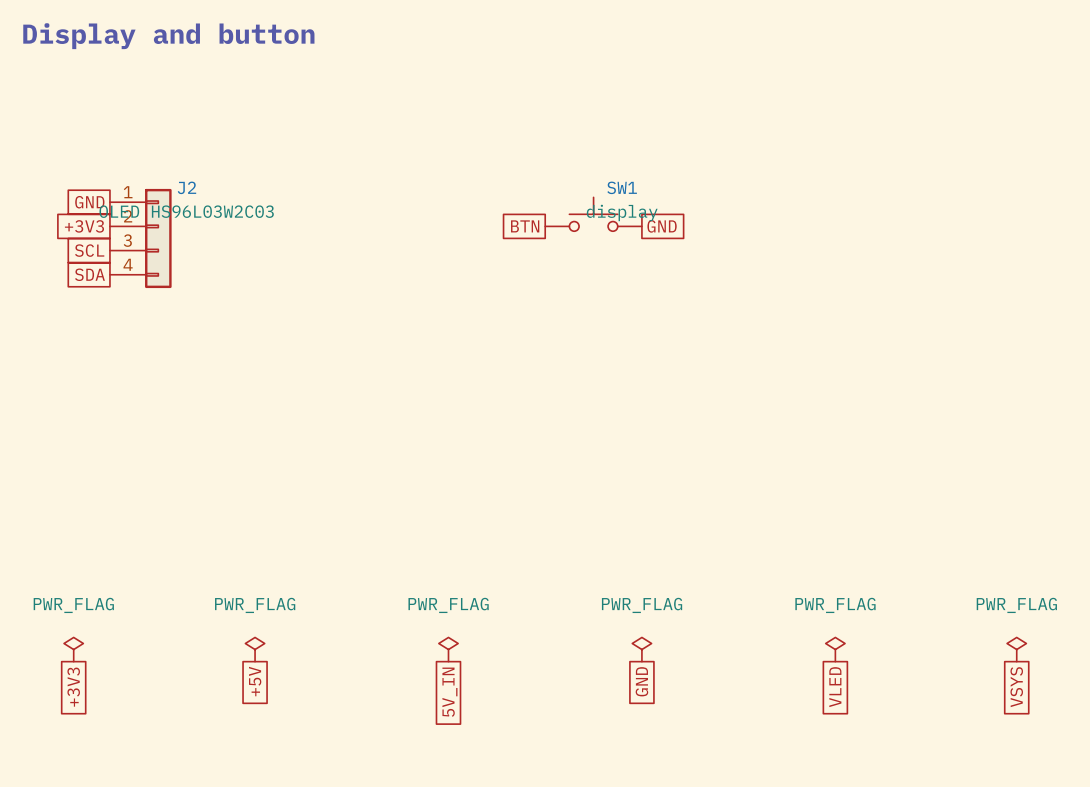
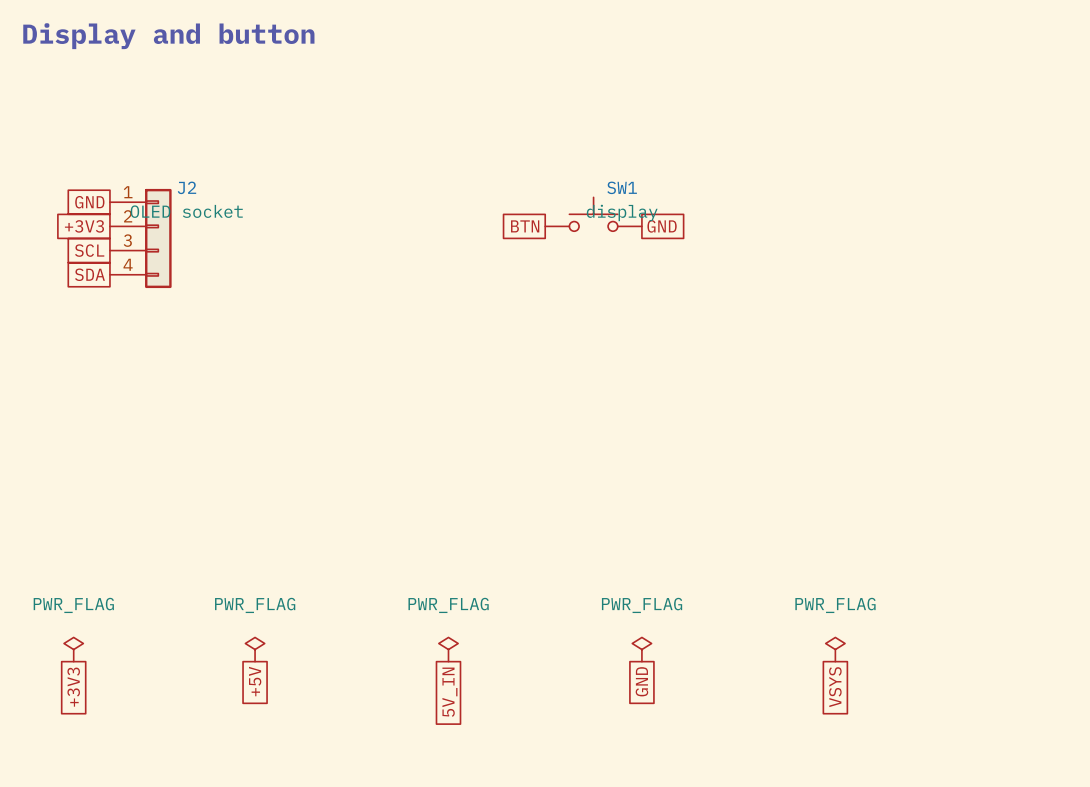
J2 value: OLED HS96L03W2C03 (186, 211) -> OLED socket (186, 211)
power symbol: PWR_FLAG (1016, 649) -> none
global label: VLED (835, 687) -> VSYS (835, 687)
global label: VSYS (1016, 687) -> none

